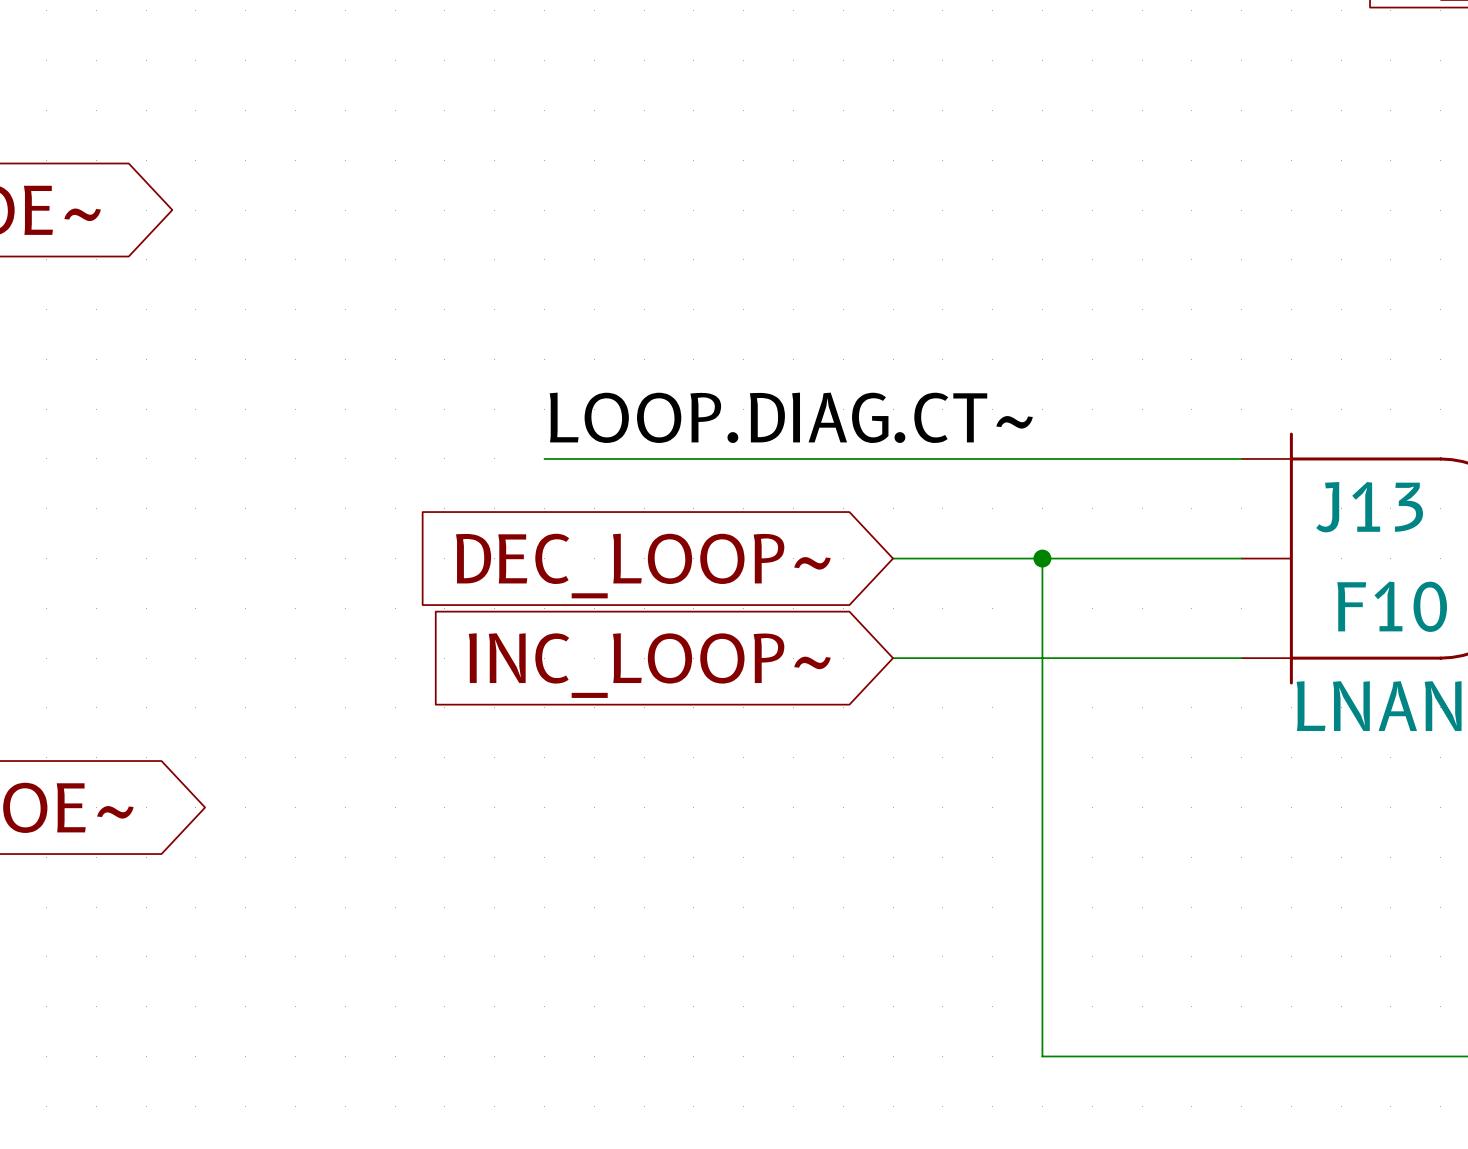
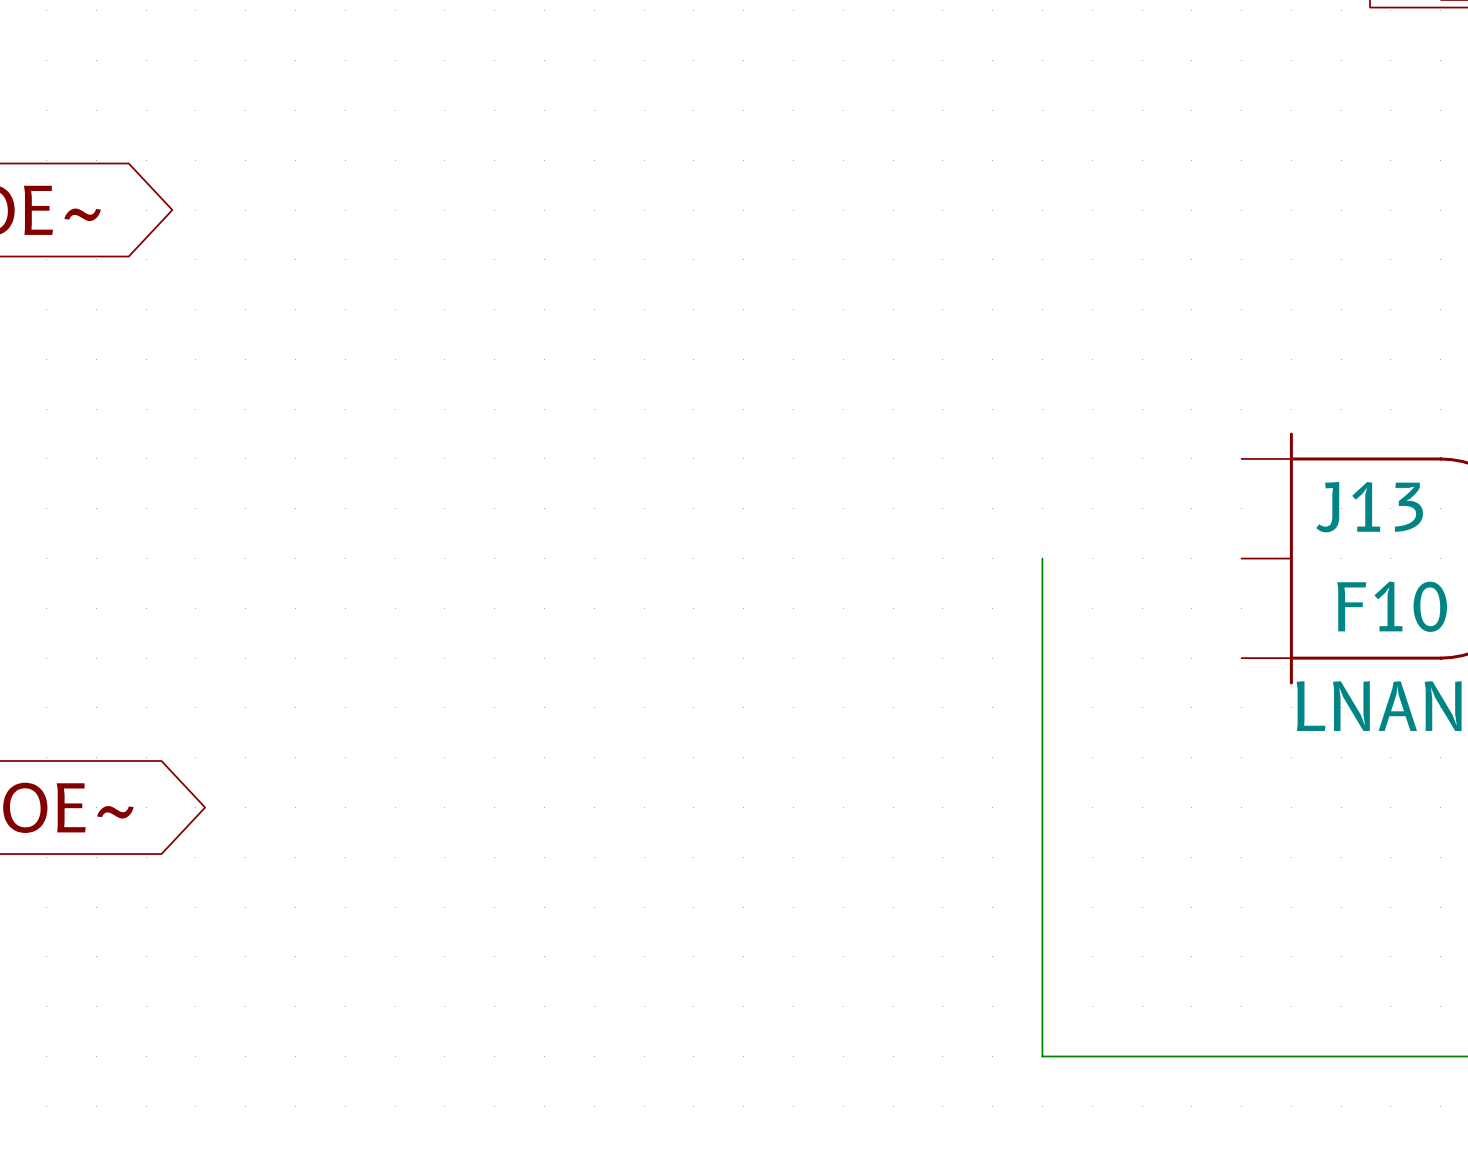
label: LOOP.DIAG.CT~ (791, 417) -> none
wire: (544, 458) (1241, 458) -> none
wire: (893, 558) (1241, 558) -> none
junction: (1042, 558) -> none
global label: DEC_LOOP~ (643, 566) -> none
wire: (893, 658) (1241, 658) -> none
global label: INC_LOOP~ (649, 665) -> none

